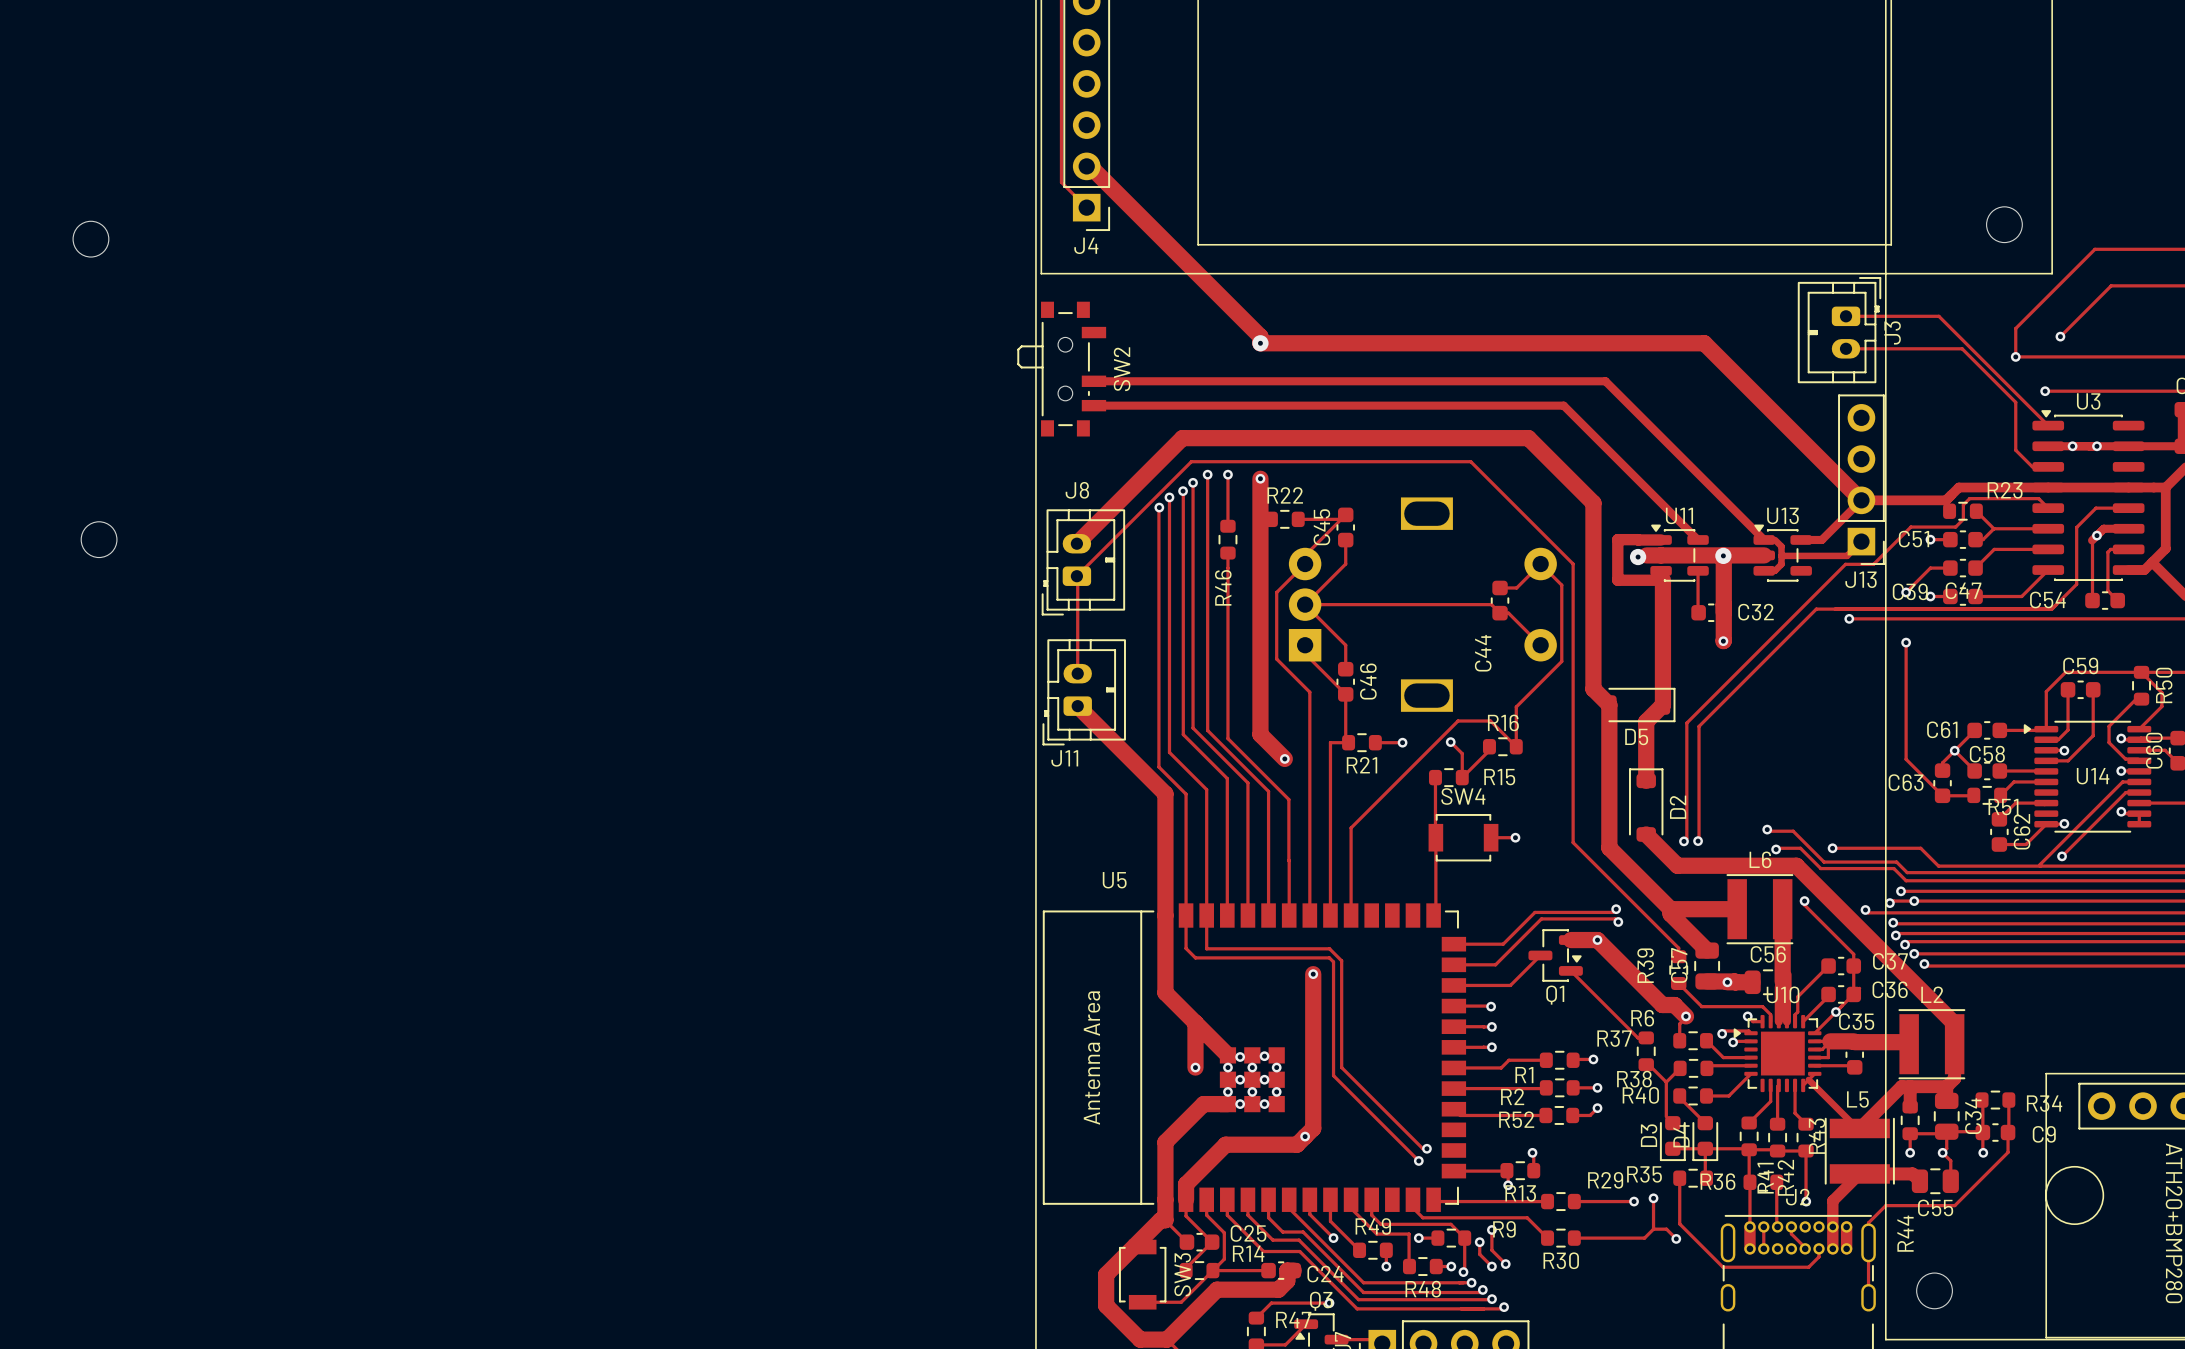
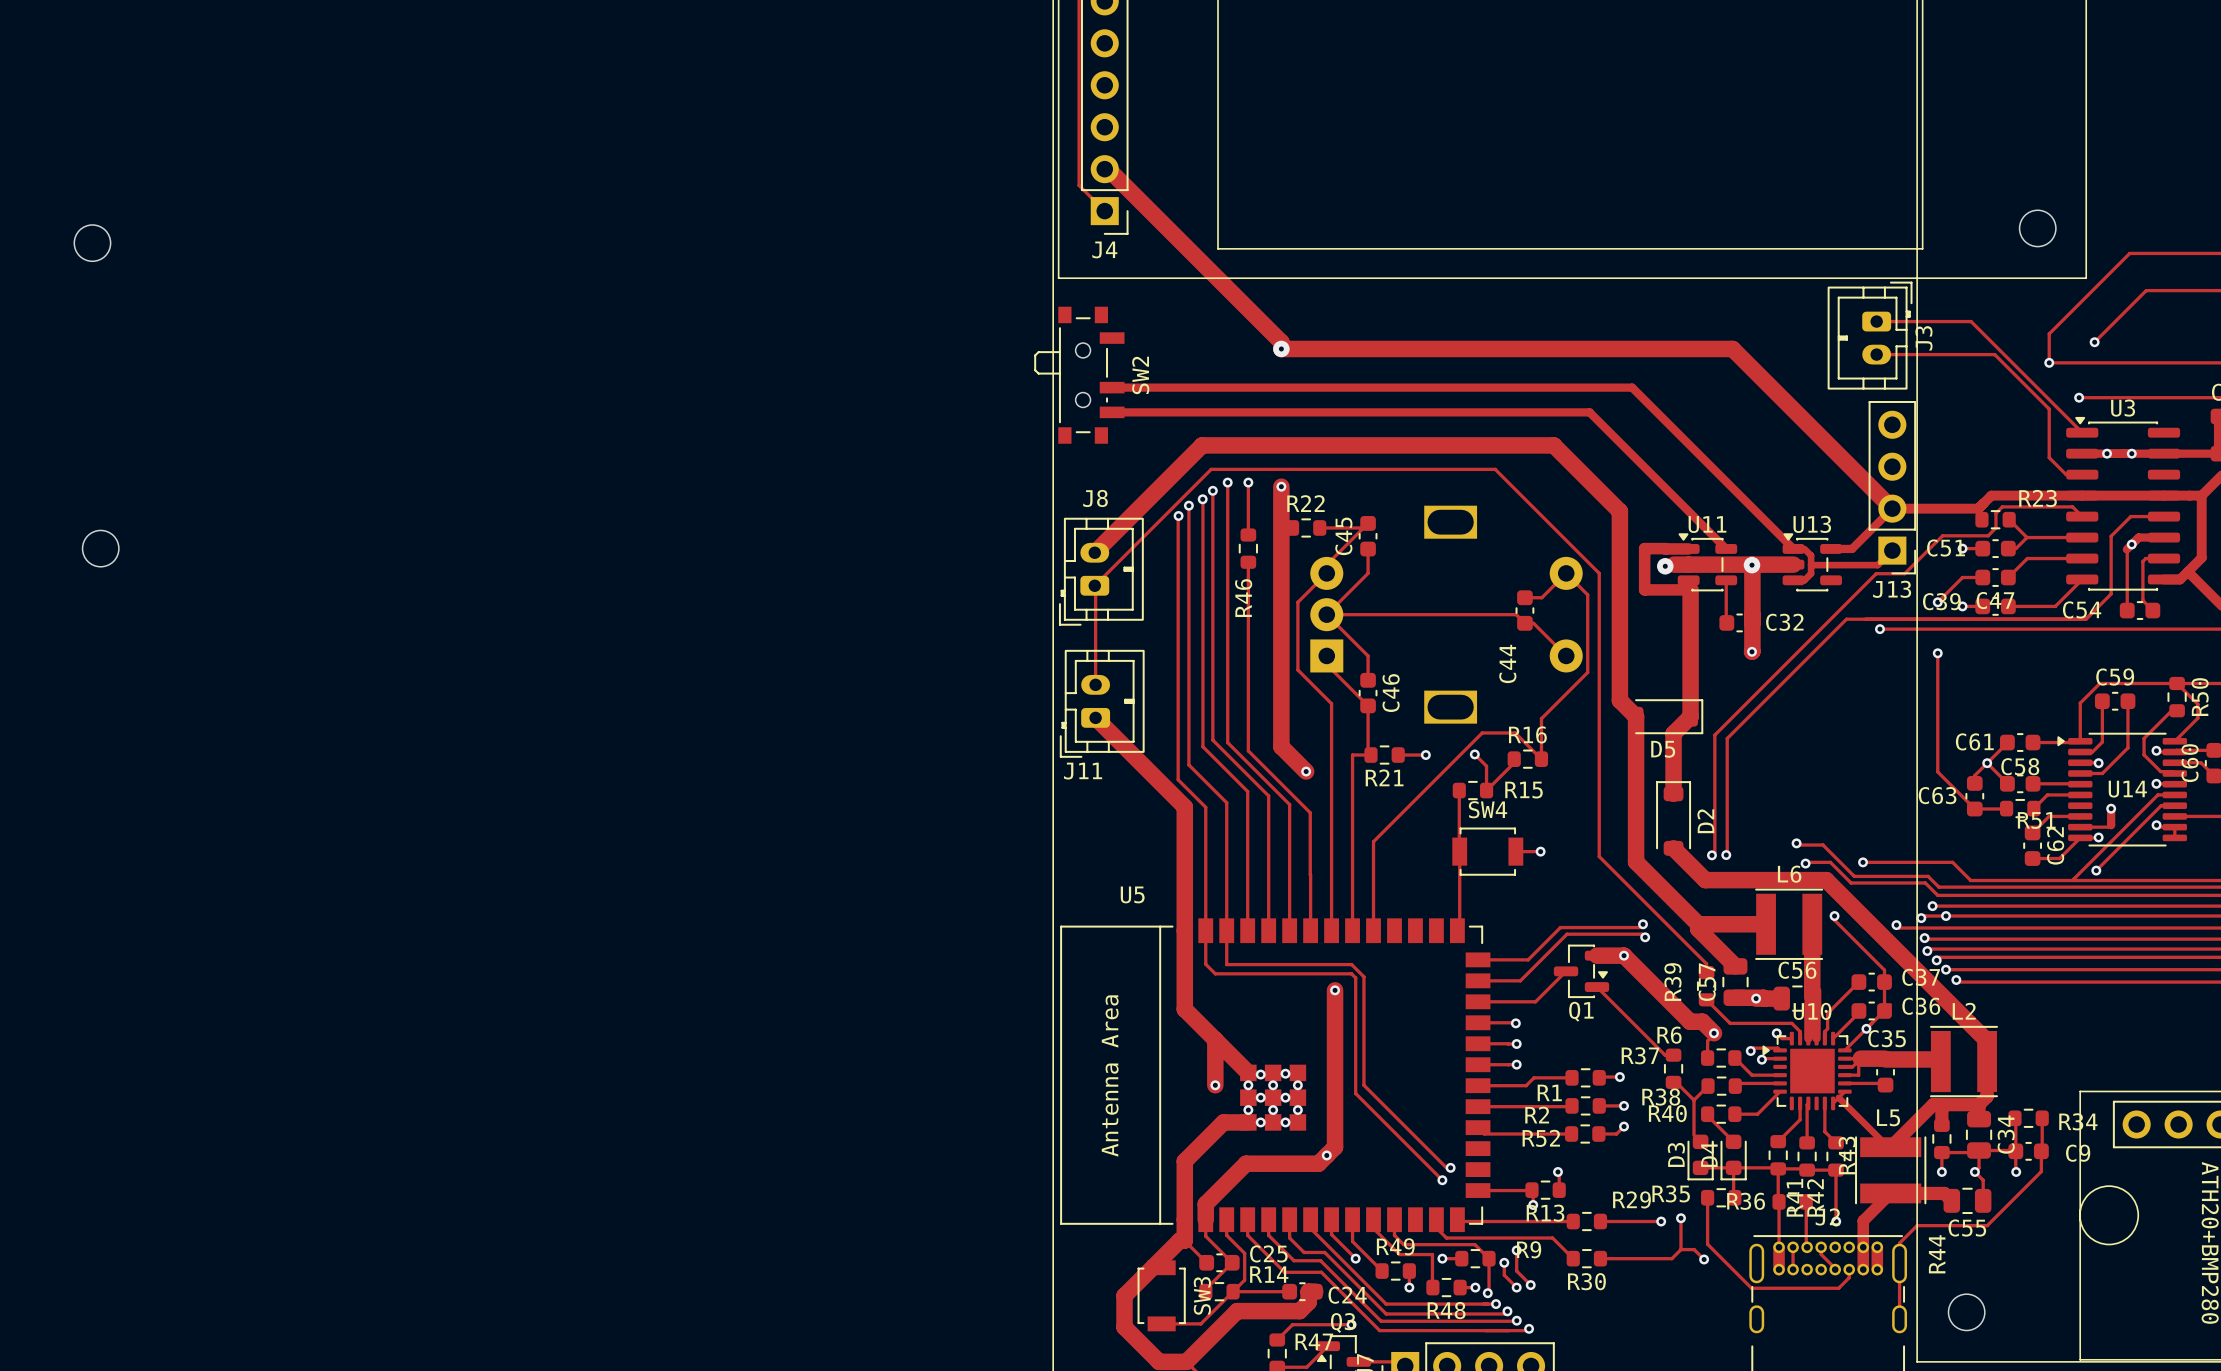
via: none -> (2111, 808)
part: none -> (2111, 816)
track: none -> (2111, 825) (2109, 827) (2080, 827)

